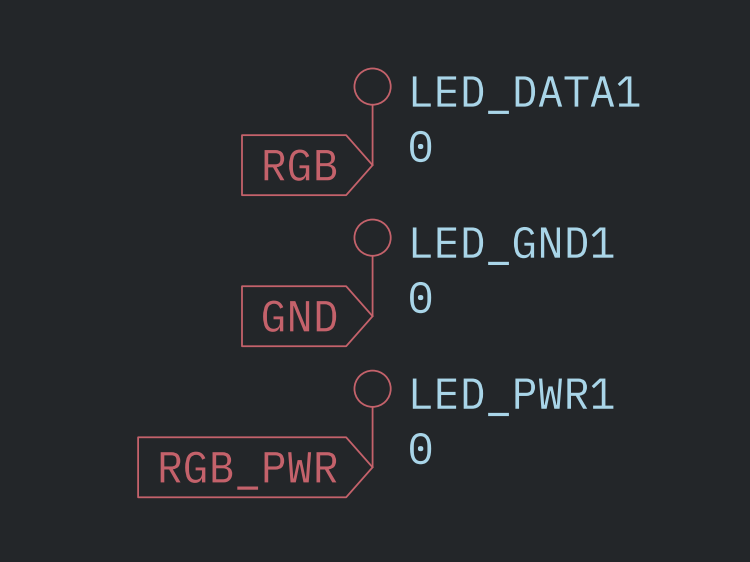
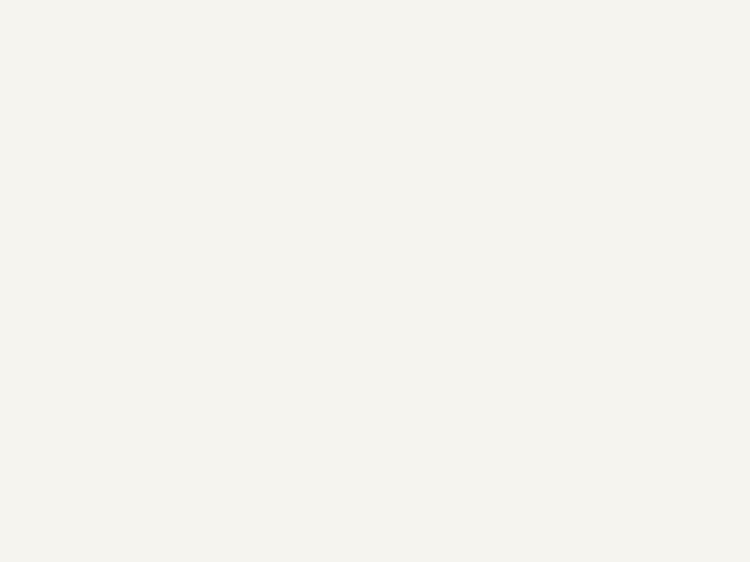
LED_DATA1: 0 (372, 116) -> none
global label: RGB (300, 165) -> none
LED_GND1: 0 (372, 267) -> none
global label: GND (299, 316) -> none
LED_PWR1: 0 (372, 418) -> none
global label: RGB_PWR (248, 470) -> none

